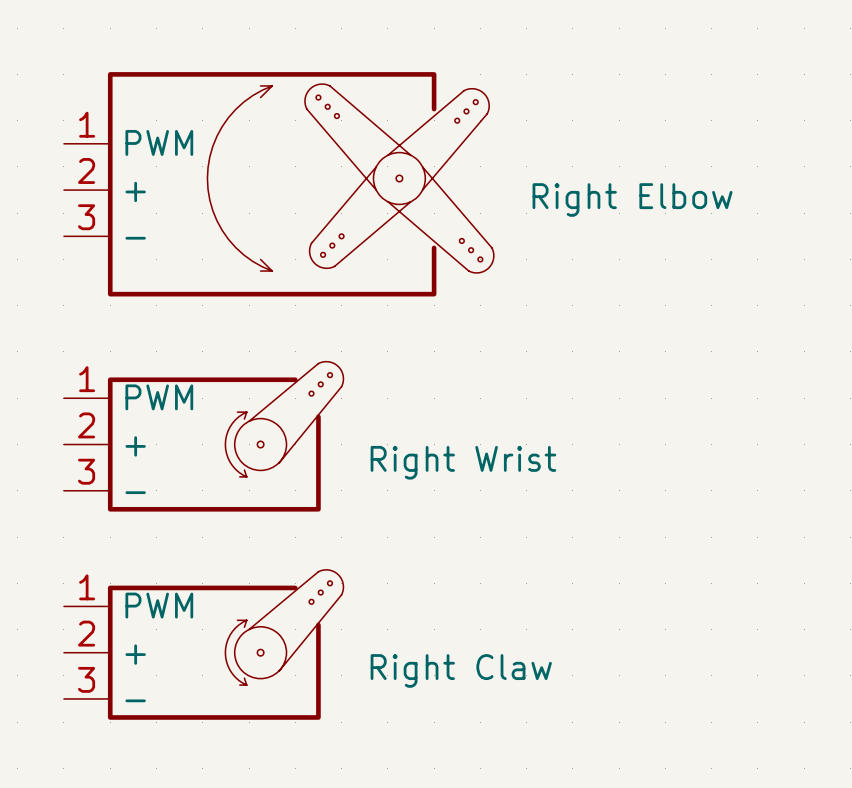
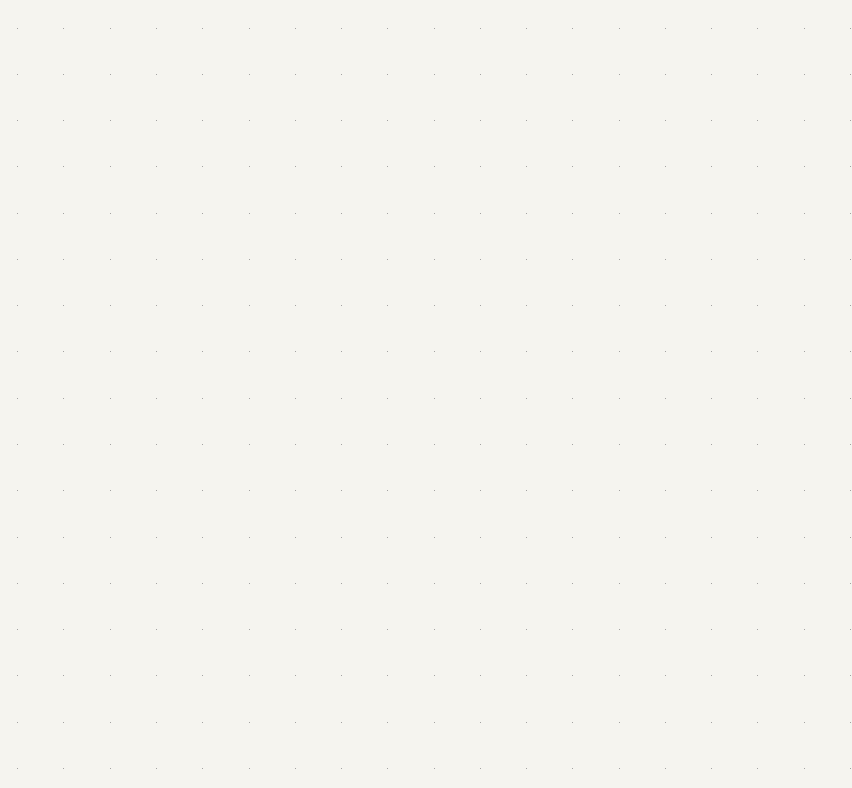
part: Right Elbow (278, 173) -> none
part: Right Wrist (203, 436) -> none
part: Right Claw (203, 644) -> none

